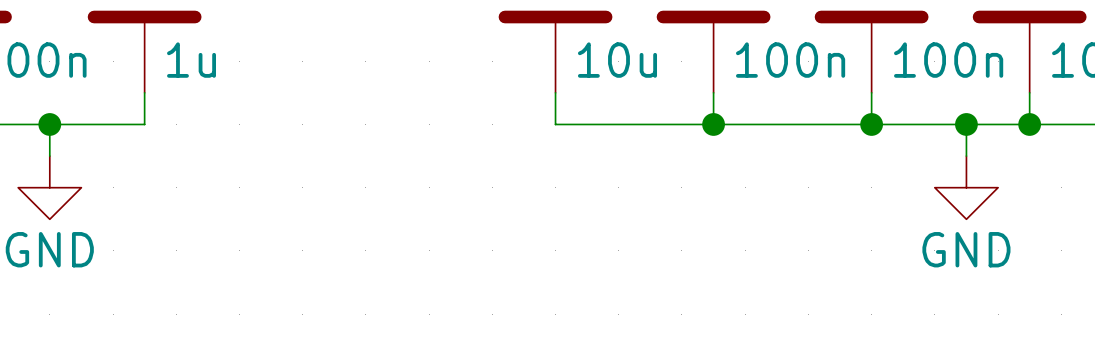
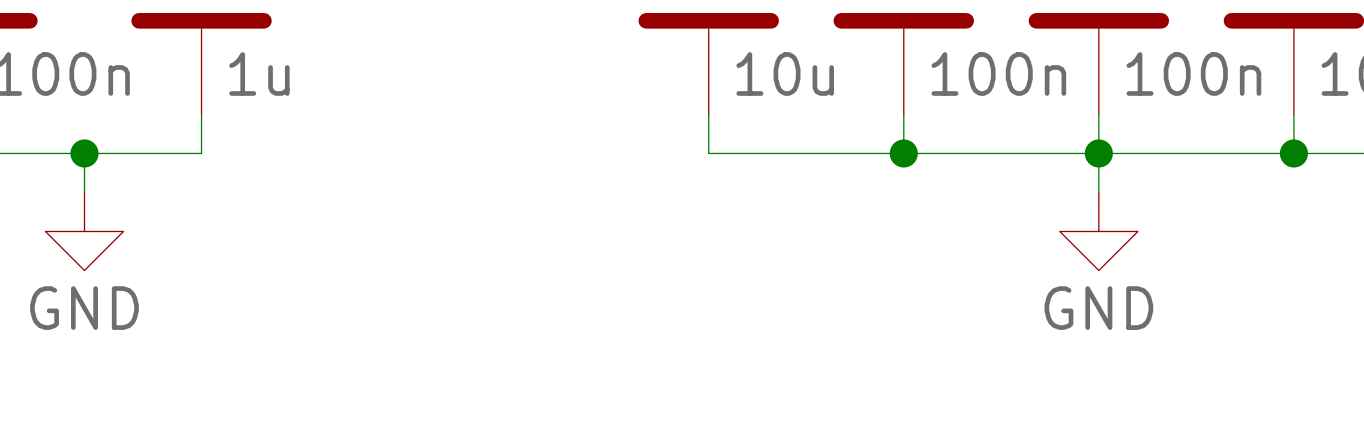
wire: (966, 124) (966, 156) -> (1098, 153) (1098, 192)
junction: (966, 124) -> none
power symbol position: GND (966, 187) -> GND (1098, 231)

